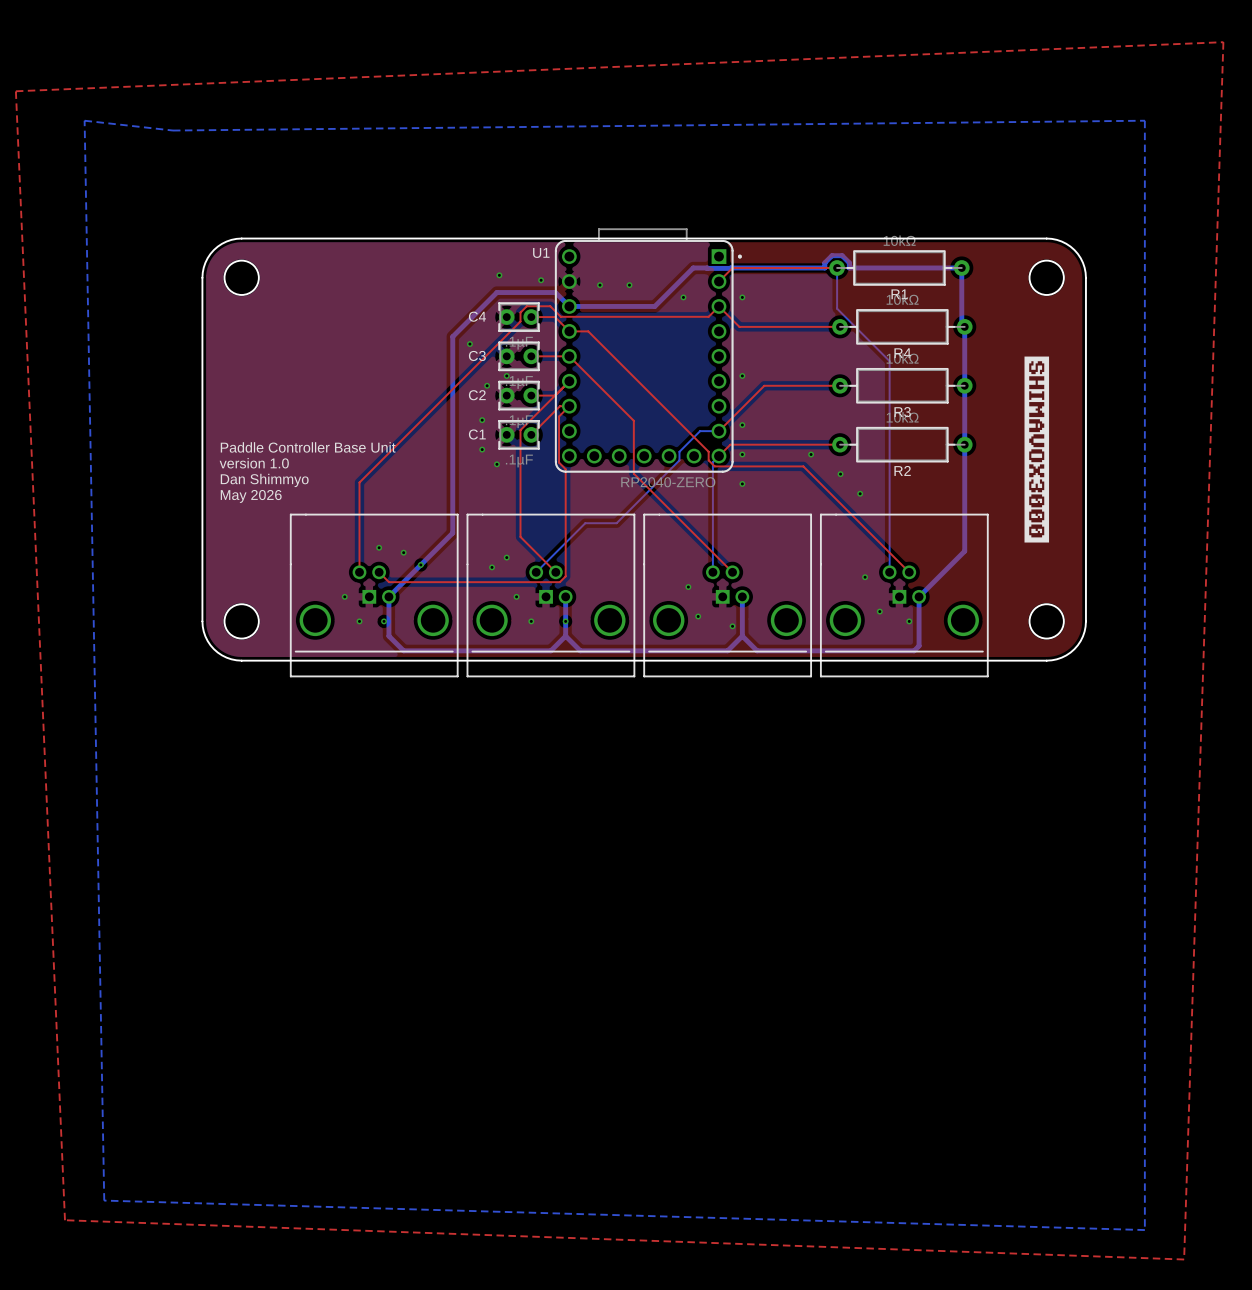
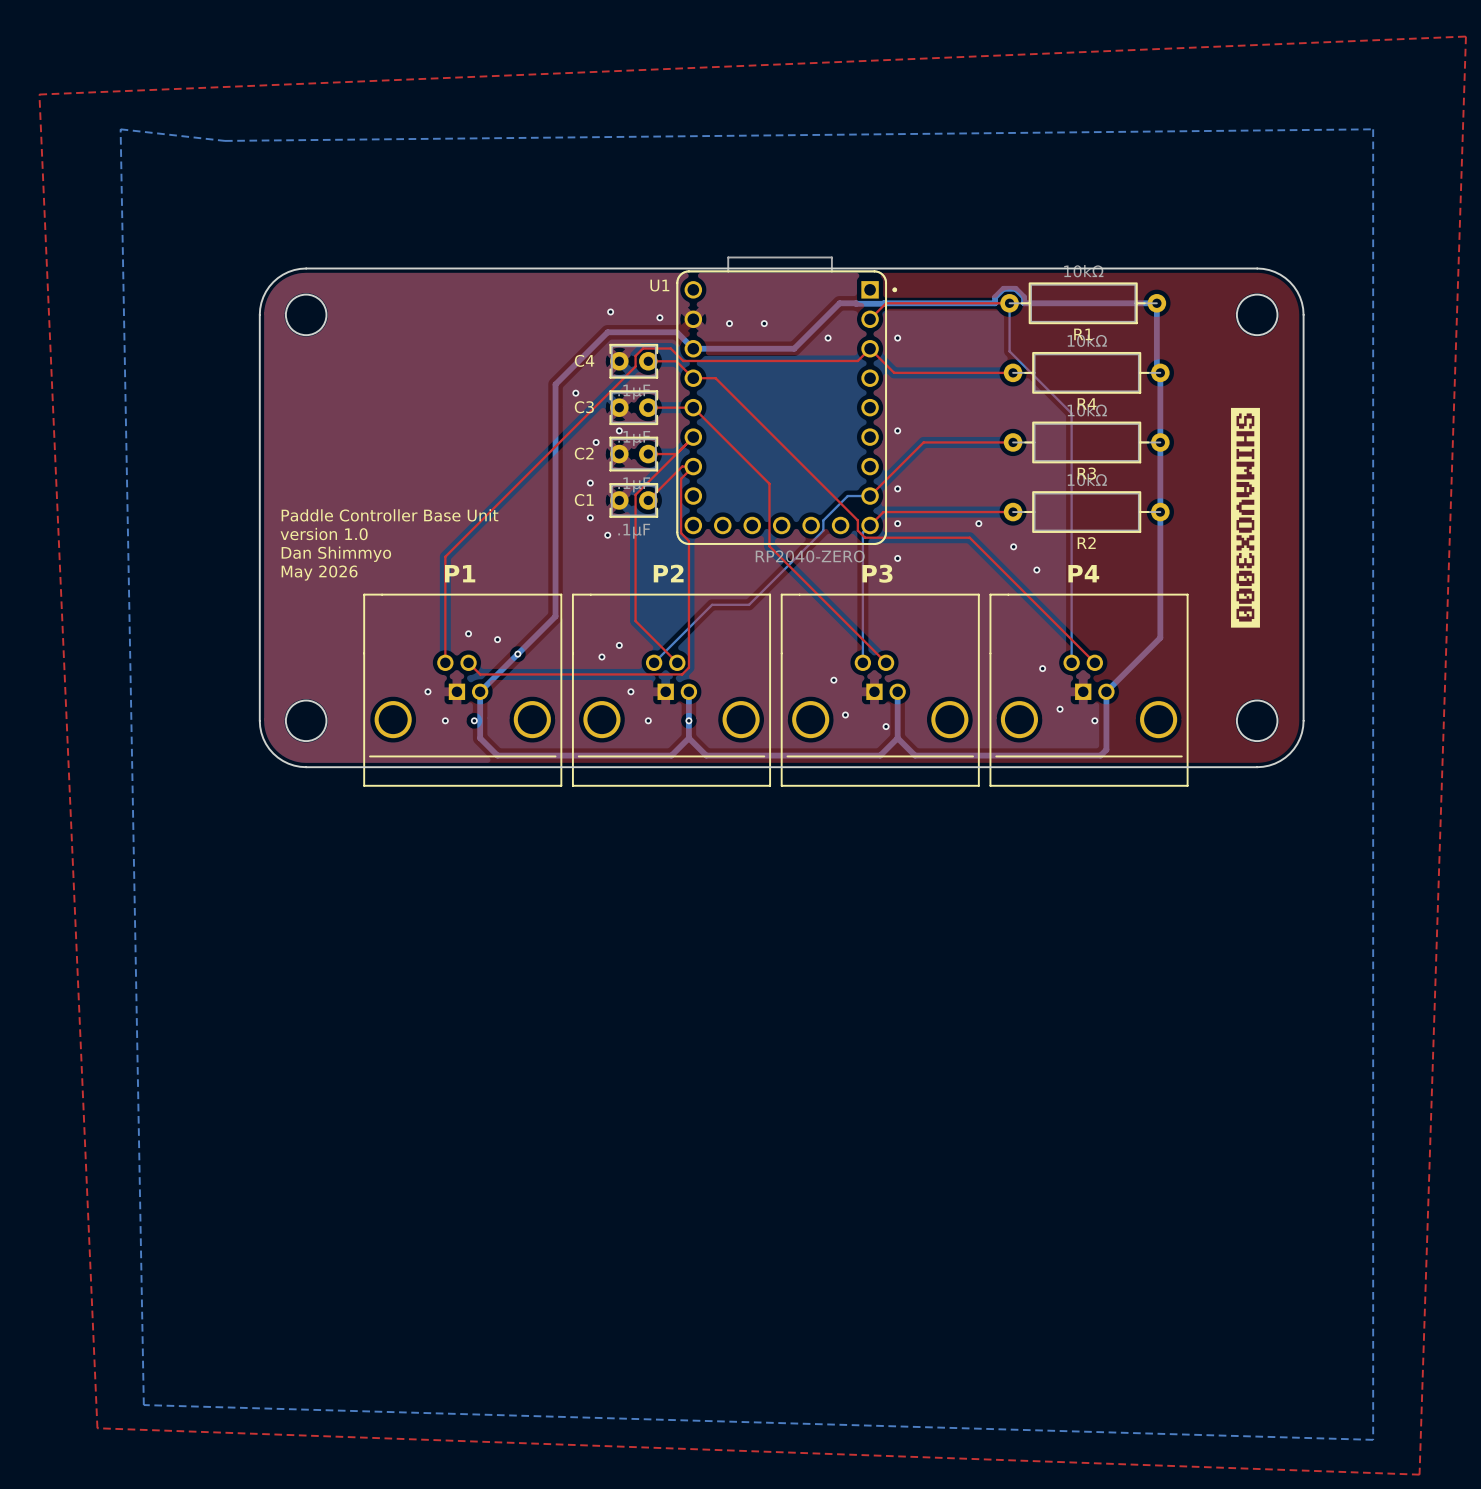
text: none -> P1 (460, 573)
text: none -> P2 (668, 573)
text: none -> P3 (877, 573)
text: none -> P4 (1083, 573)

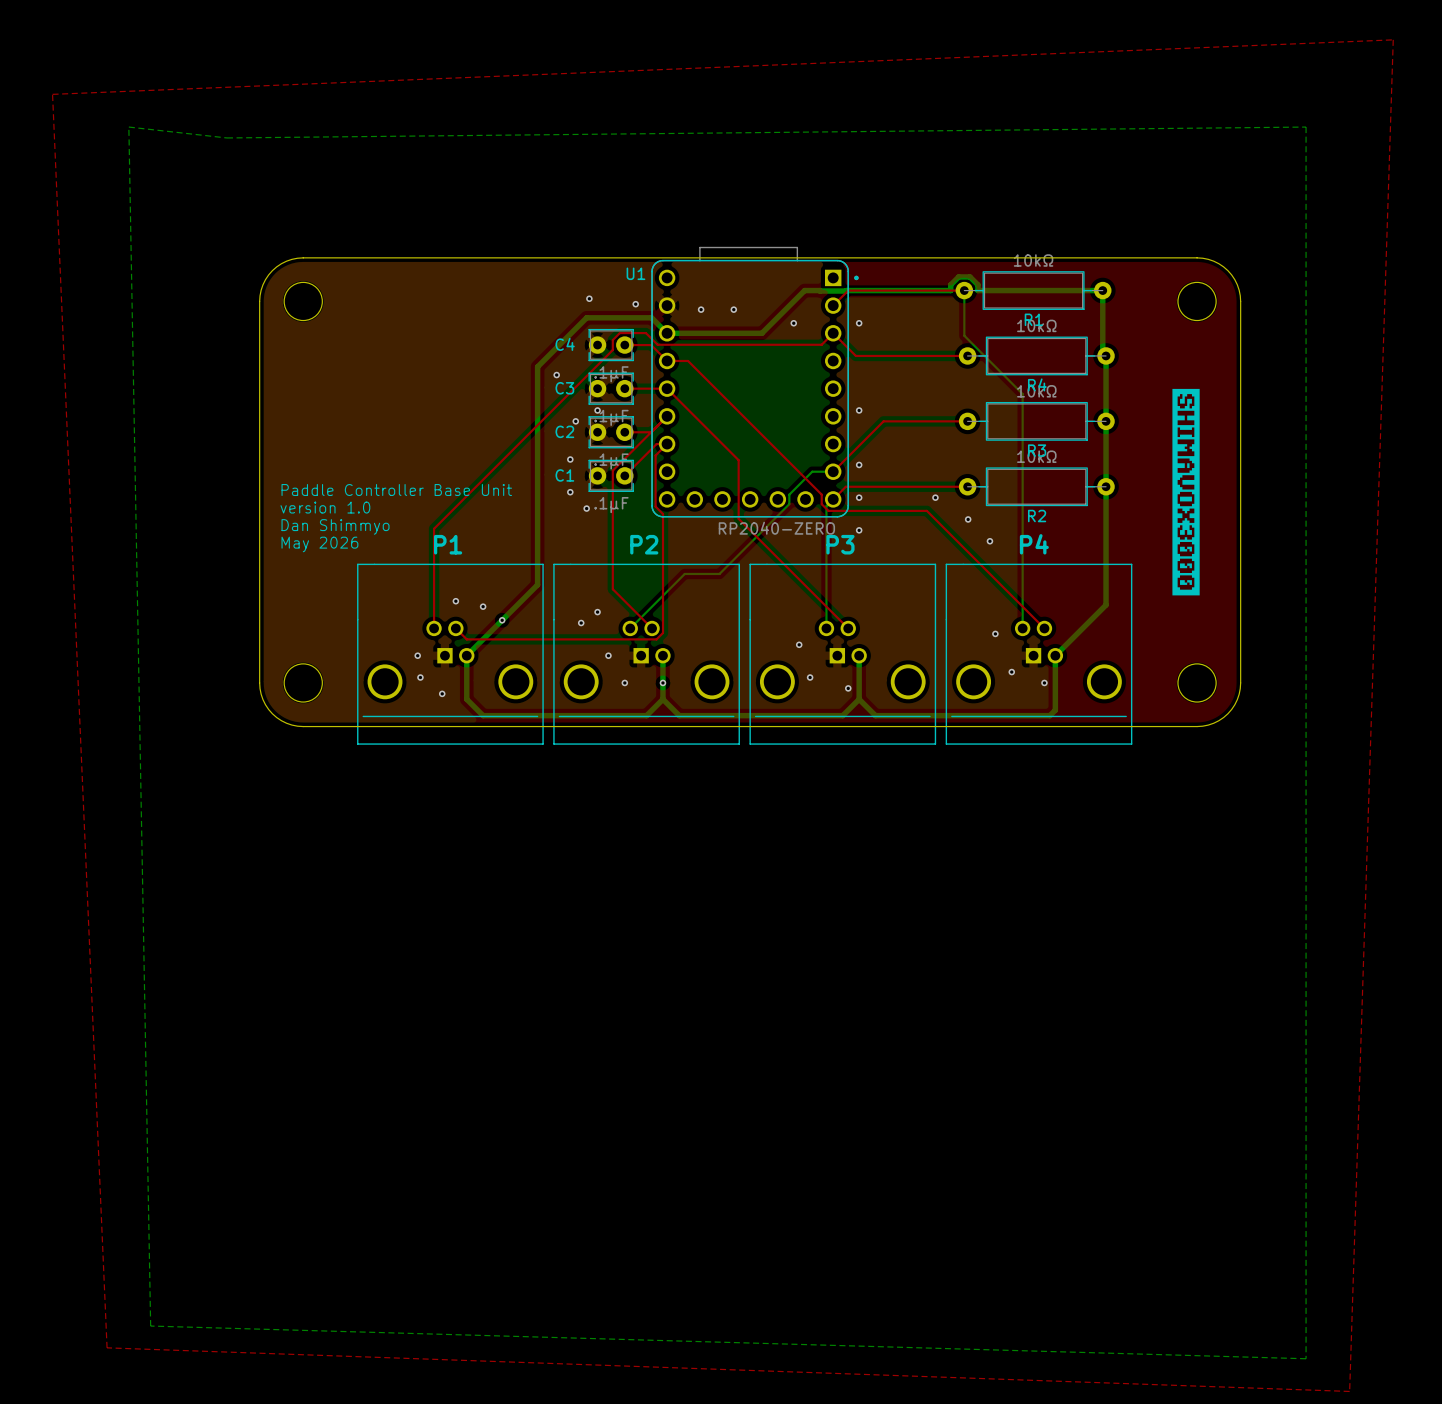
via: none -> (420, 677)
via: (445, 720) -> none
via: (474, 720) -> none
via: none -> (442, 693)

